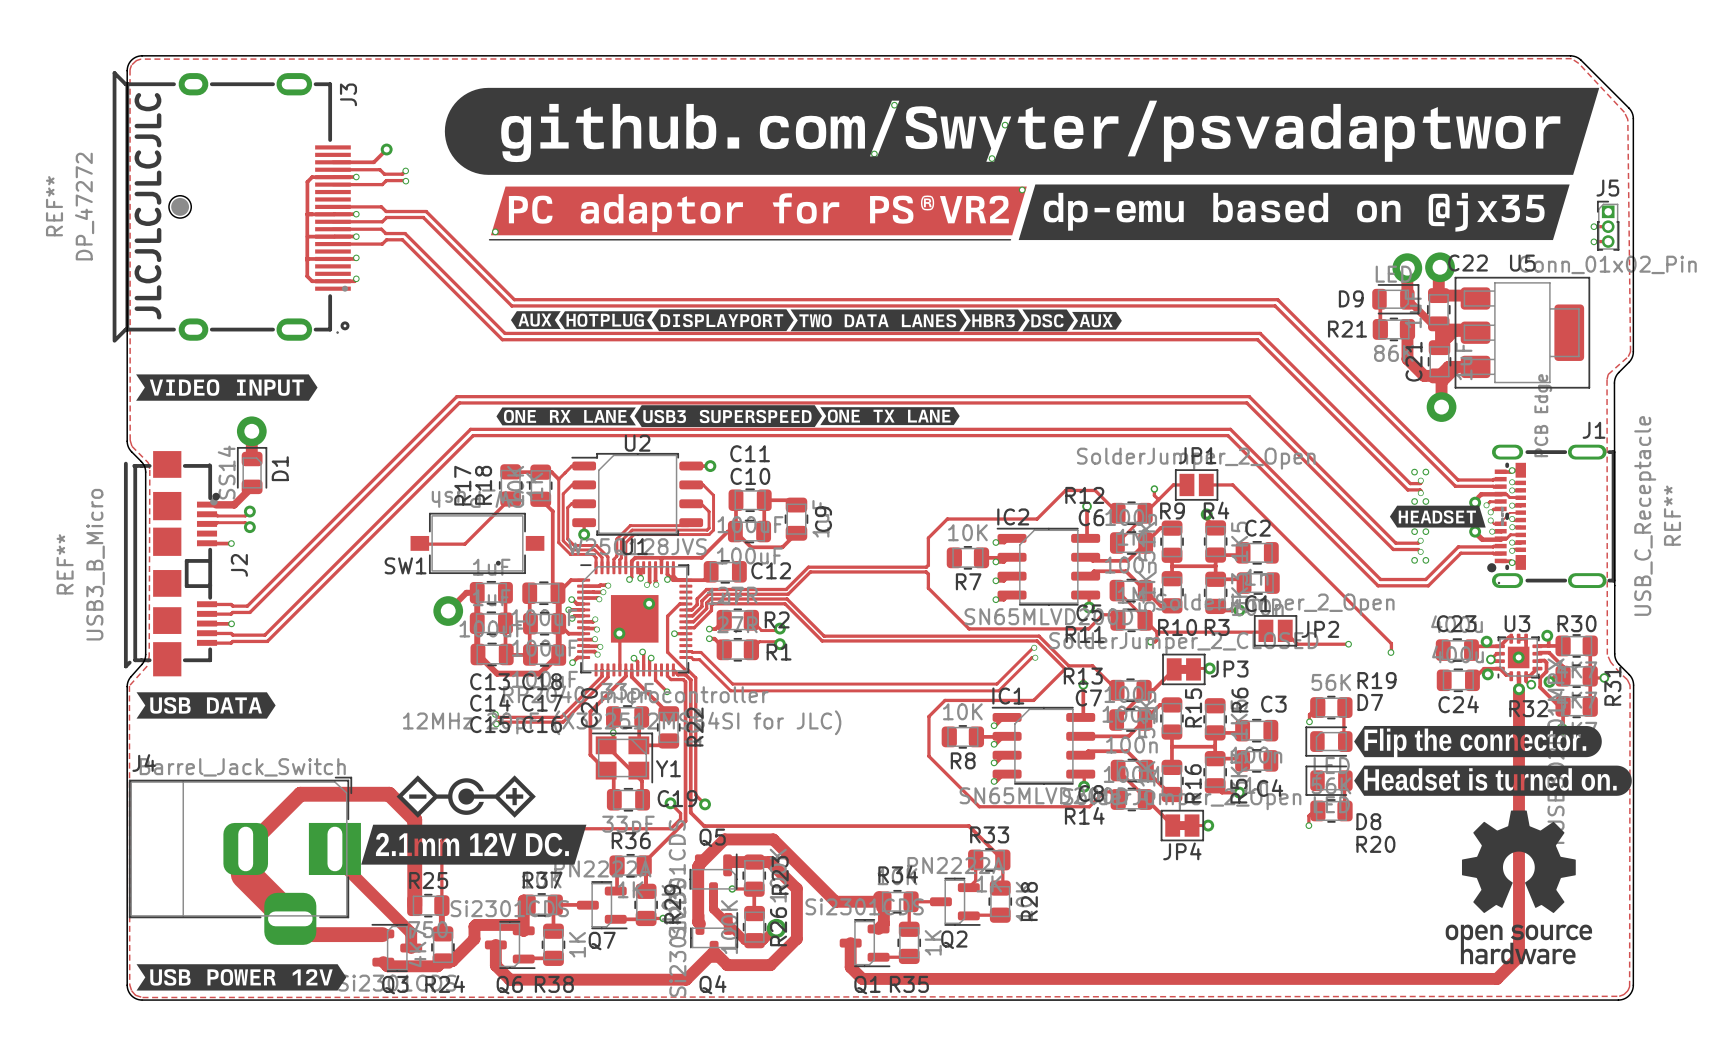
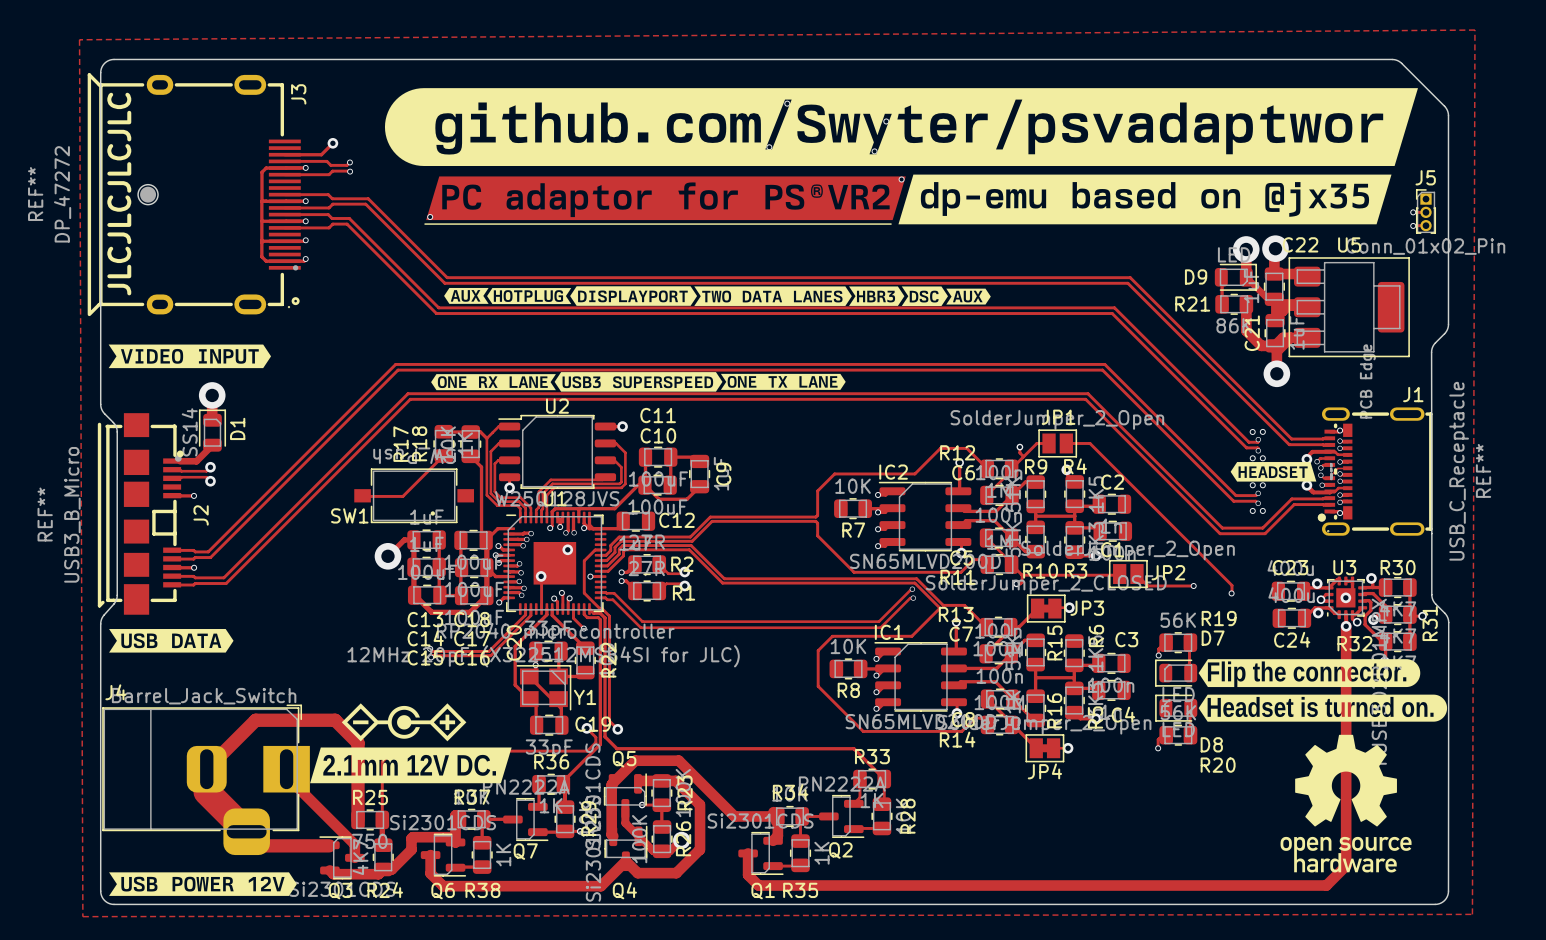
zone outline: (1571, 58) (1578, 63) (1624, 112) (1627, 119) (1630, 351) (1628, 356) (1608, 374) (1607, 379) (1607, 654) (1610, 662) (1630, 685) (1629, 986) (1623, 994) (1619, 996) (142, 997) (135, 995) (131, 990) (129, 984) (129, 685) (146, 666) (149, 656) (149, 469) (148, 462) (131, 446) (130, 440) (130, 69) (136, 60) (1571, 58) -> (1474, 30) (79, 39) (82, 916) (1472, 914) (1474, 30)

